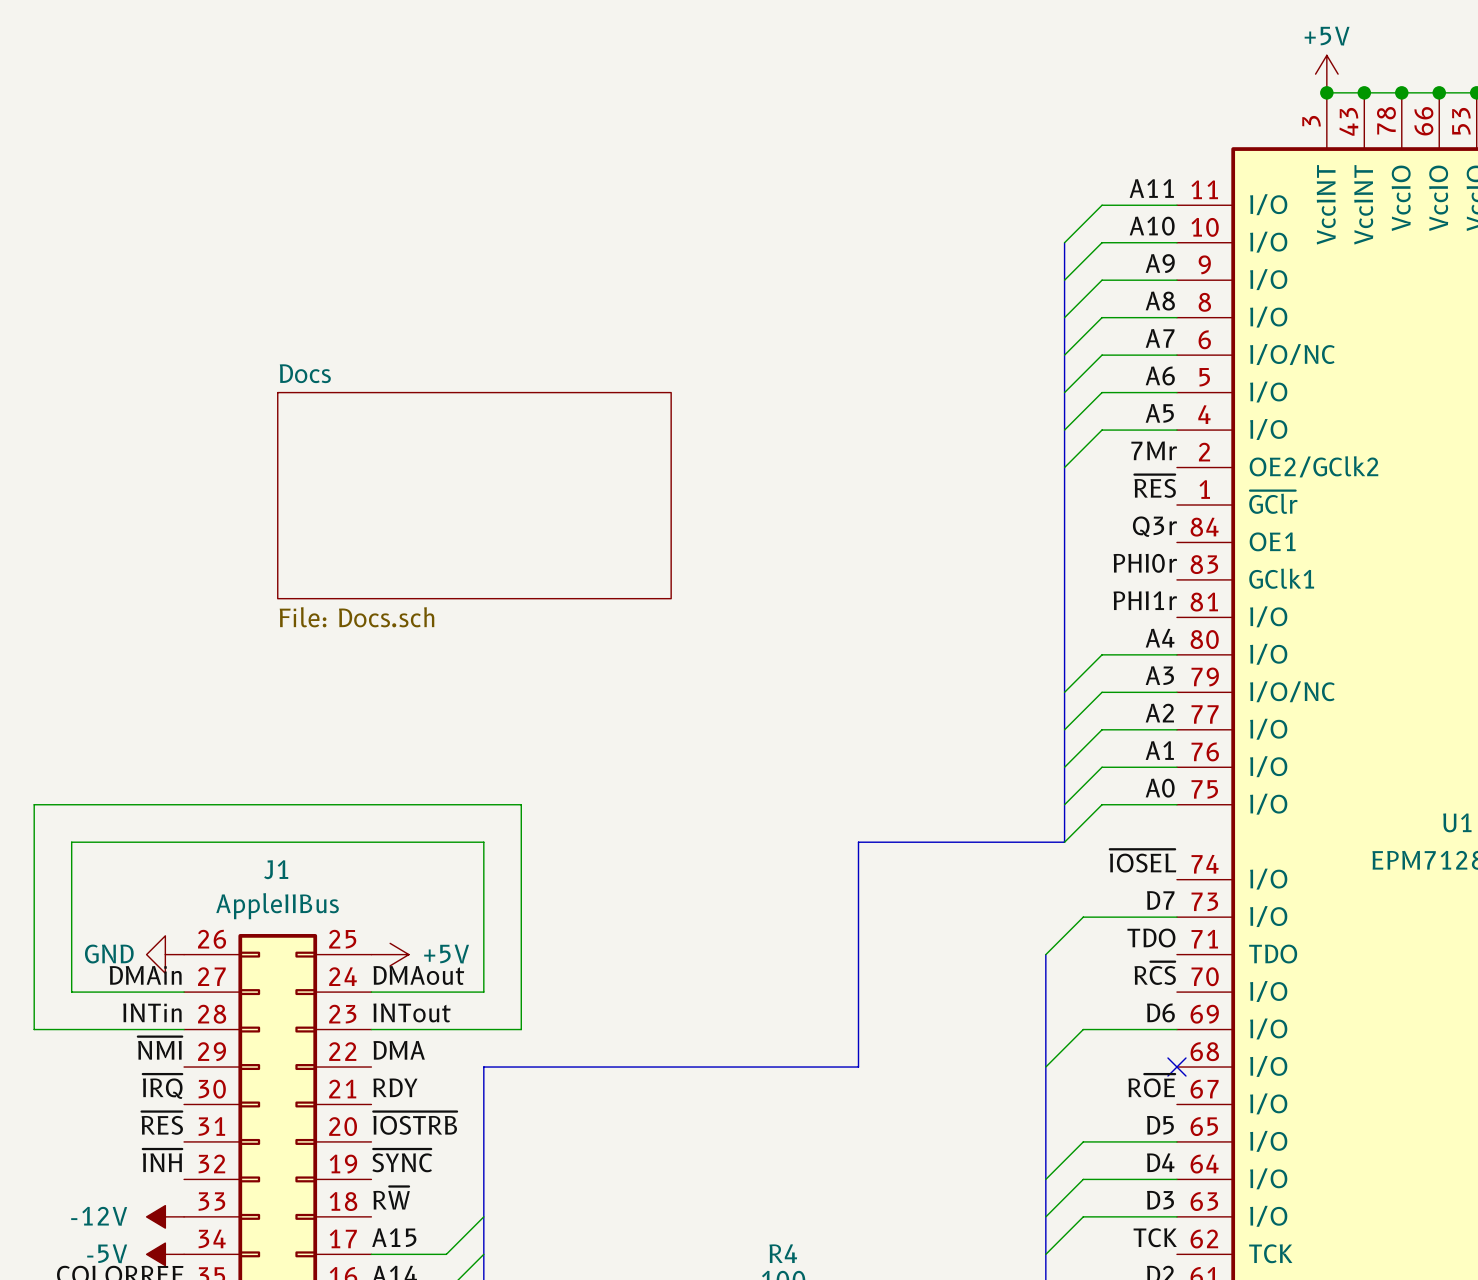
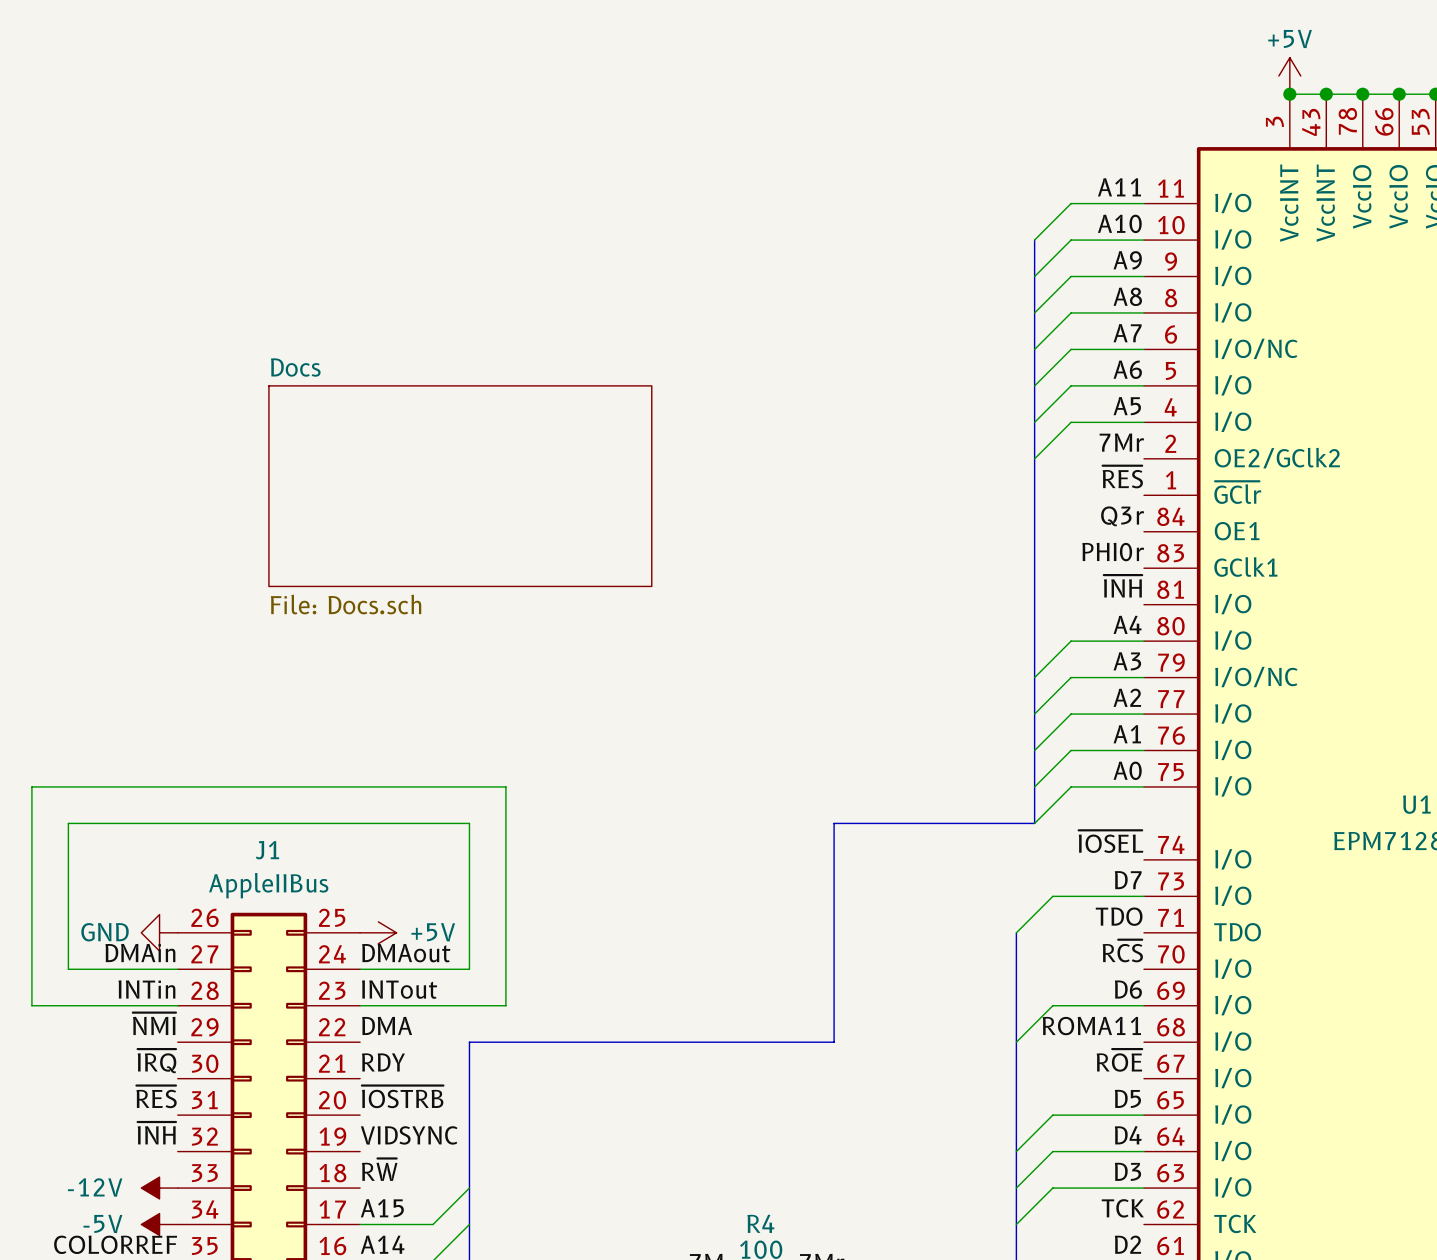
label: PHI1r (1145, 600) -> ~{INH} (1123, 586)
label: none -> ROMA11 (1091, 1026)
no-connect mark: (1176, 1067) -> none
label: ~{SYNC} (402, 1160) -> VIDSYNC (409, 1135)

